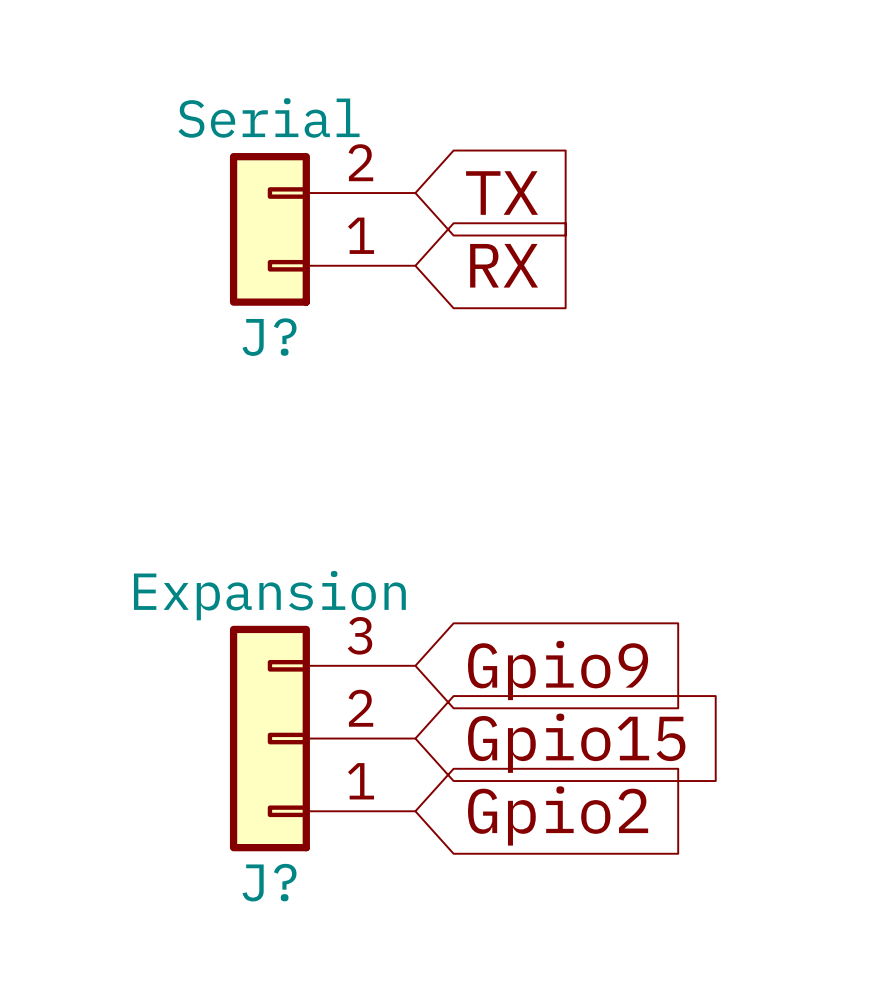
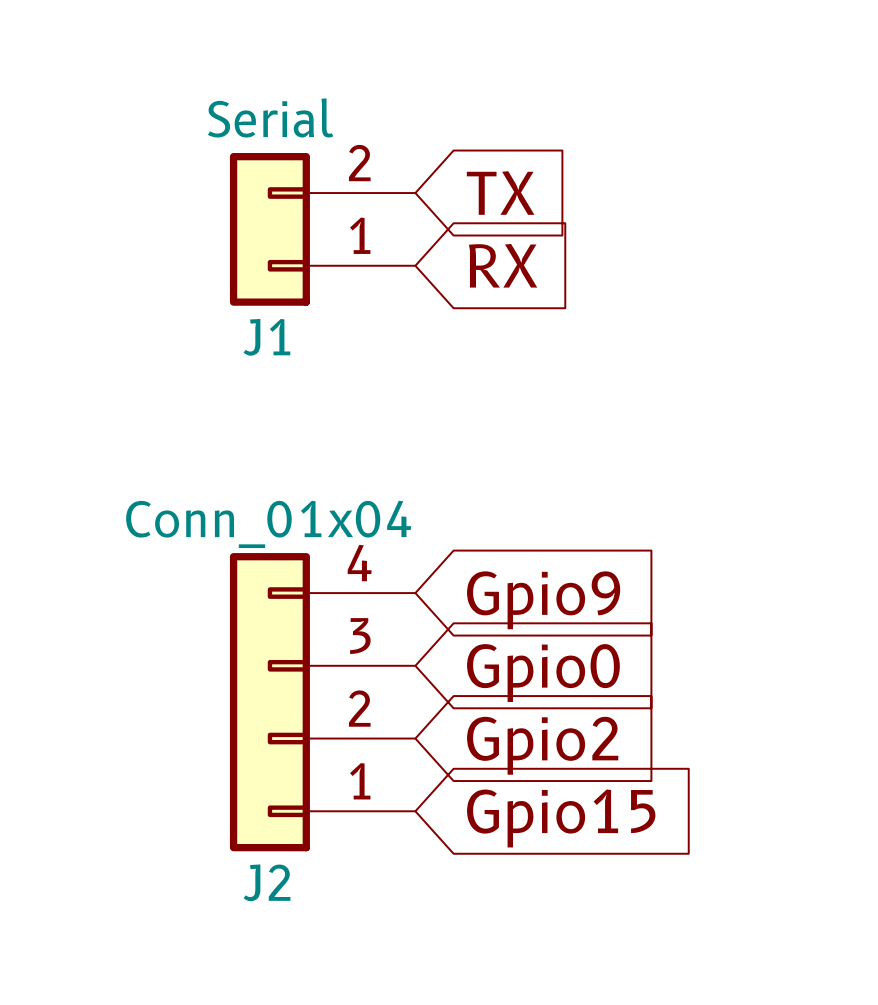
J? name: J? (269, 337) -> J1 (266, 337)
global label: none -> Gpio9 (543, 600)
global label: Gpio9 (558, 670) -> Gpio0 (543, 673)
J2: none -> Conn_01x04 (322, 702)
J?: Expansion (322, 738) -> none
global label: Gpio15 (576, 743) -> Gpio2 (542, 745)
global label: Gpio2 (558, 815) -> Gpio15 (561, 818)

